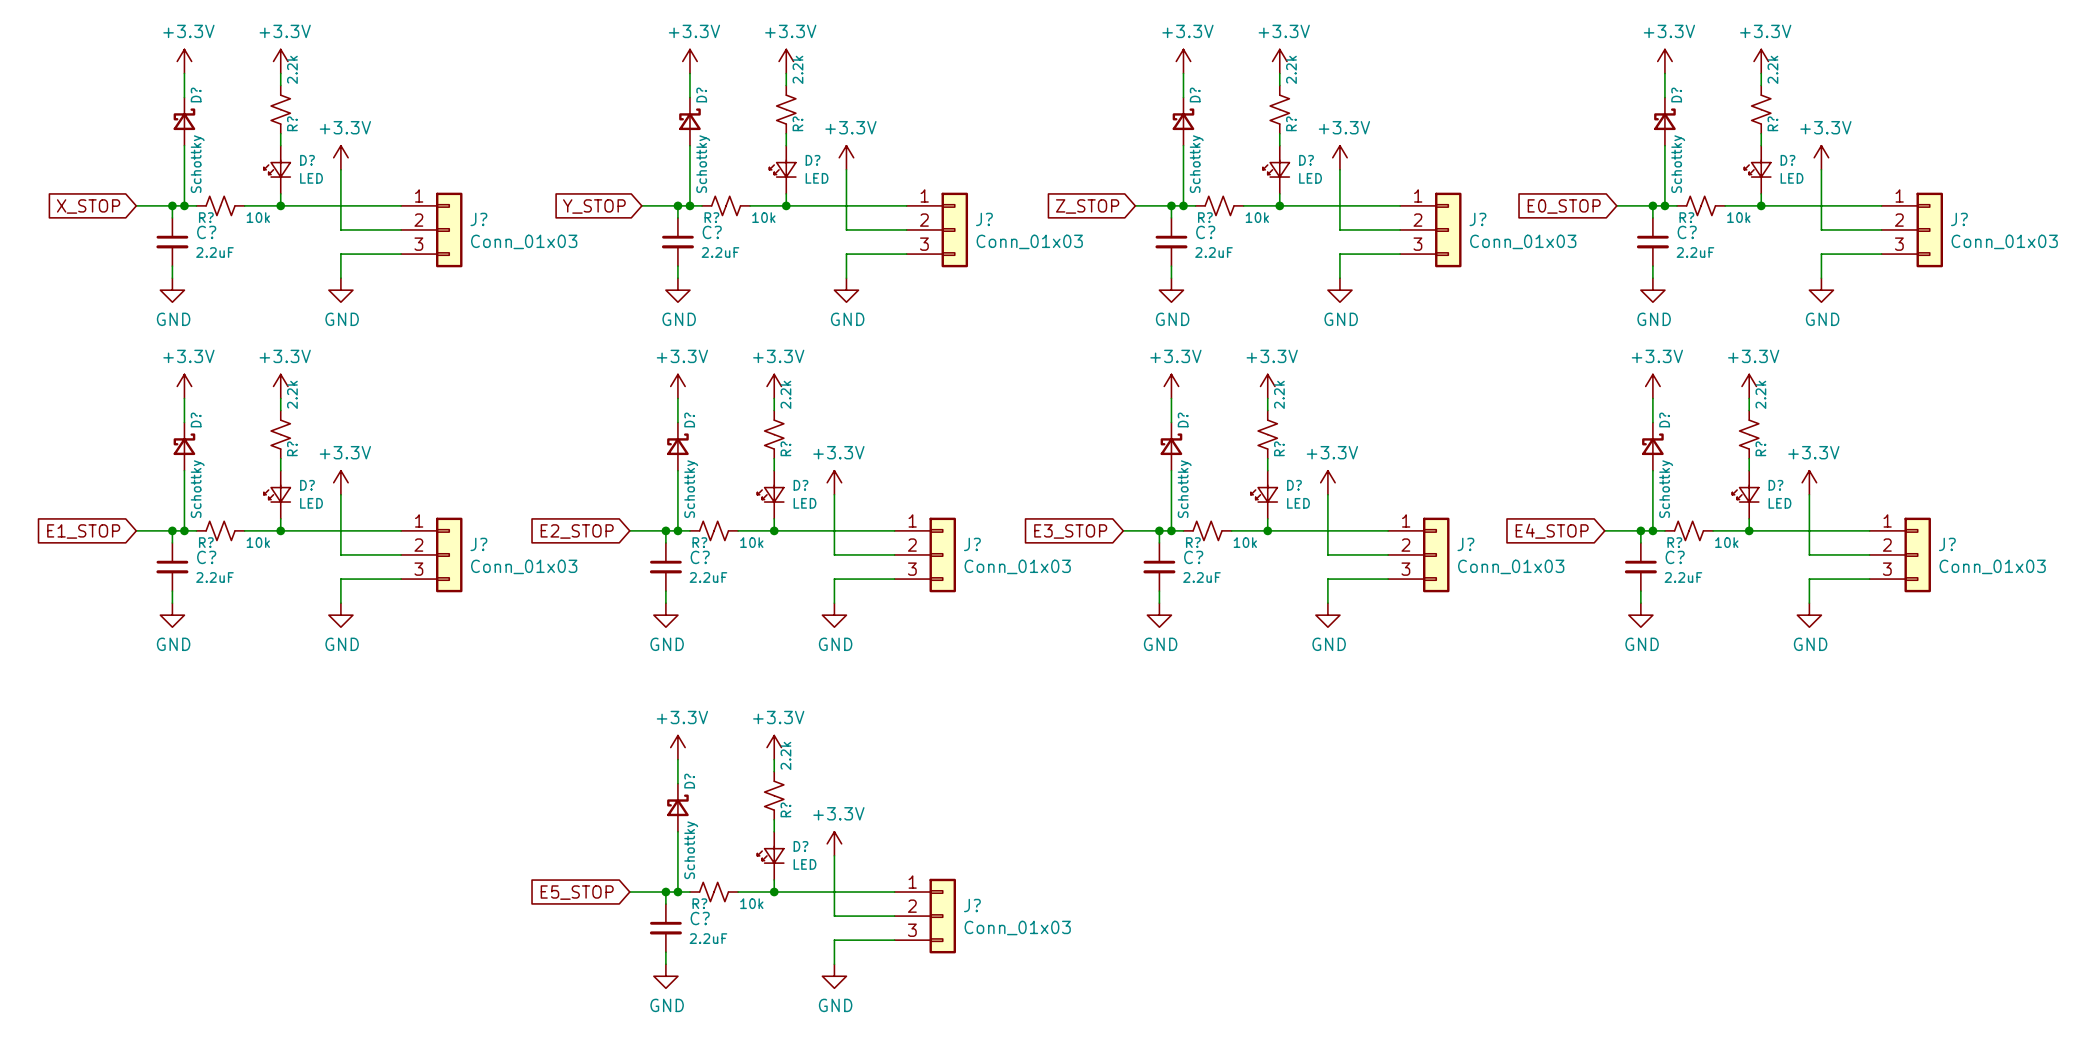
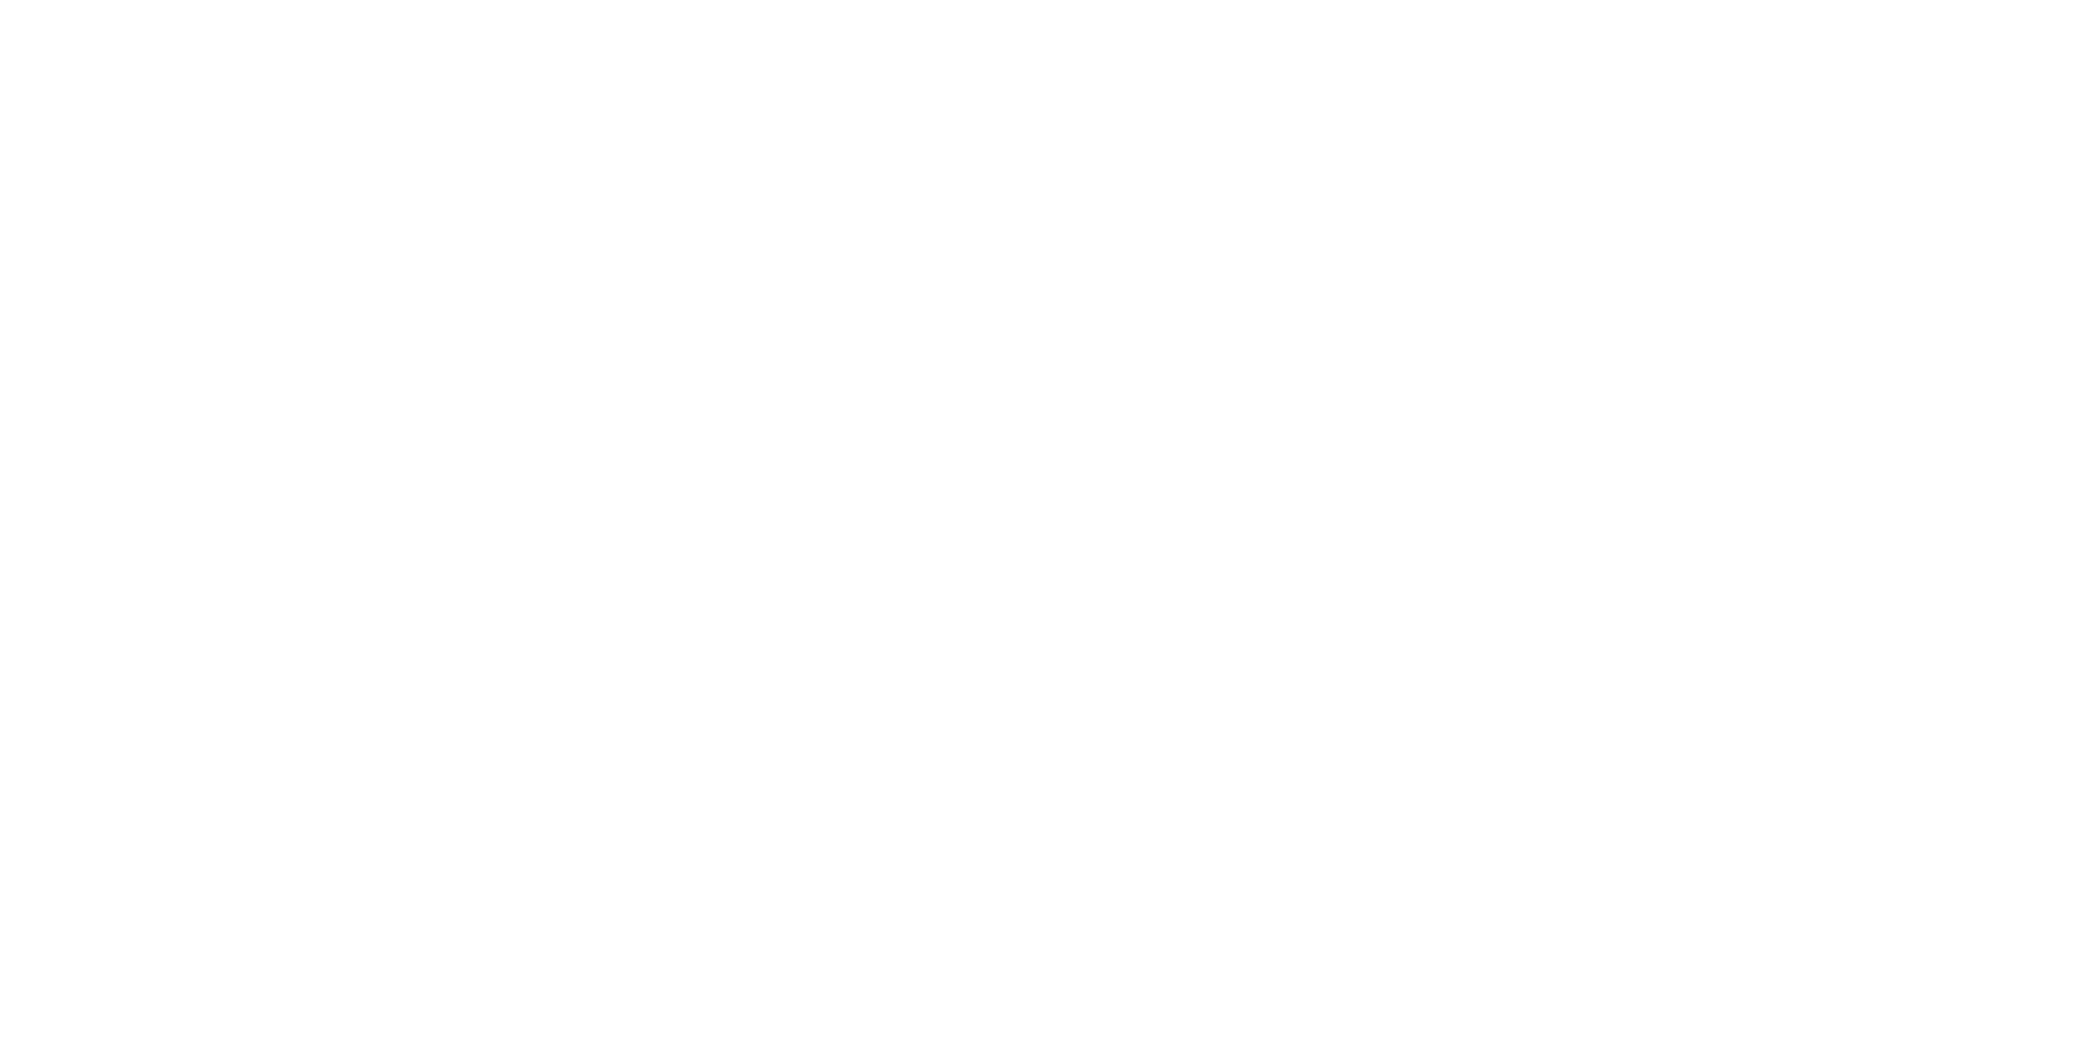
power symbol: +3.3V (184, 61) -> none
power symbol: +3.3V (280, 61) -> none
power symbol: +3.3V (689, 61) -> none
power symbol: +3.3V (786, 61) -> none
power symbol: +3.3V (1183, 61) -> none
power symbol: +3.3V (1279, 61) -> none
power symbol: +3.3V (1664, 61) -> none
power symbol: +3.3V (1761, 61) -> none
wire: (184, 73) (184, 97) -> none
wire: (280, 73) (280, 85) -> none
wire: (689, 73) (689, 97) -> none
wire: (786, 73) (786, 85) -> none
wire: (1183, 73) (1183, 97) -> none
wire: (1279, 73) (1279, 85) -> none
wire: (1664, 73) (1664, 97) -> none
wire: (1761, 73) (1761, 85) -> none
R?: 2.2k (280, 109) -> none
R?: 2.2k (786, 109) -> none
R?: 2.2k (1279, 109) -> none
R?: 2.2k (1761, 109) -> none
D?: Schottky (184, 121) -> none
D?: Schottky (689, 121) -> none
D?: Schottky (1183, 121) -> none
D?: Schottky (1664, 121) -> none
wire: (280, 133) (280, 145) -> none
wire: (786, 133) (786, 145) -> none
wire: (1279, 133) (1279, 145) -> none
wire: (1761, 133) (1761, 145) -> none
wire: (184, 145) (184, 205) -> none
wire: (689, 145) (689, 205) -> none
wire: (1183, 145) (1183, 205) -> none
wire: (1664, 145) (1664, 205) -> none
power symbol: +3.3V (340, 157) -> none
power symbol: +3.3V (846, 157) -> none
power symbol: +3.3V (1339, 157) -> none
power symbol: +3.3V (1821, 157) -> none
D?: LED (277, 169) -> none
wire: (340, 169) (340, 229) (401, 229) -> none
D?: LED (782, 169) -> none
wire: (846, 169) (846, 229) (906, 229) -> none
D?: LED (1276, 169) -> none
wire: (1339, 169) (1339, 229) (1400, 229) -> none
D?: LED (1757, 169) -> none
wire: (1821, 169) (1821, 229) (1881, 229) -> none
wire: (280, 193) (280, 205) -> none
wire: (786, 193) (786, 205) -> none
wire: (1279, 193) (1279, 205) -> none
wire: (1761, 193) (1761, 205) -> none
wire: (136, 205) (196, 205) -> none
wire: (172, 205) (172, 217) -> none
junction: (172, 205) -> none
junction: (184, 205) -> none
R?: 10k (220, 205) -> none
wire: (244, 205) (401, 205) -> none
junction: (280, 205) -> none
wire: (641, 205) (702, 205) -> none
wire: (677, 205) (677, 217) -> none
junction: (677, 205) -> none
junction: (689, 205) -> none
R?: 10k (726, 205) -> none
wire: (750, 205) (906, 205) -> none
junction: (786, 205) -> none
wire: (1135, 205) (1195, 205) -> none
wire: (1171, 205) (1171, 217) -> none
junction: (1171, 205) -> none
junction: (1183, 205) -> none
R?: 10k (1219, 205) -> none
wire: (1243, 205) (1400, 205) -> none
junction: (1279, 205) -> none
wire: (1616, 205) (1676, 205) -> none
wire: (1652, 205) (1652, 217) -> none
junction: (1652, 205) -> none
junction: (1664, 205) -> none
R?: 10k (1701, 205) -> none
wire: (1725, 205) (1881, 205) -> none
junction: (1761, 205) -> none
global label: X_STOP (88, 206) -> none
global label: Y_STOP (594, 206) -> none
global label: Z_STOP (1087, 206) -> none
global label: E0_STOP (1564, 206) -> none
J?: Conn_01x03 (431, 229) -> none
J?: Conn_01x03 (937, 229) -> none
J?: Conn_01x03 (1430, 229) -> none
J?: Conn_01x03 (1912, 229) -> none
C?: 2.2uF (172, 242) -> none
C?: 2.2uF (677, 242) -> none
C?: 2.2uF (1171, 242) -> none
C?: 2.2uF (1652, 242) -> none
wire: (401, 254) (340, 254) (340, 278) -> none
wire: (906, 254) (846, 254) (846, 278) -> none
wire: (1400, 254) (1339, 254) (1339, 278) -> none
wire: (1881, 254) (1821, 254) (1821, 278) -> none
wire: (172, 266) (172, 278) -> none
wire: (677, 266) (677, 278) -> none
wire: (1171, 266) (1171, 278) -> none
wire: (1652, 266) (1652, 278) -> none
power symbol: GND (172, 290) -> none
power symbol: GND (340, 290) -> none
power symbol: GND (677, 290) -> none
power symbol: GND (846, 290) -> none
power symbol: GND (1171, 290) -> none
power symbol: GND (1339, 290) -> none
power symbol: GND (1652, 290) -> none
power symbol: GND (1821, 290) -> none
power symbol: +3.3V (184, 386) -> none
power symbol: +3.3V (280, 386) -> none
power symbol: +3.3V (677, 386) -> none
power symbol: +3.3V (774, 386) -> none
power symbol: +3.3V (1171, 386) -> none
power symbol: +3.3V (1267, 386) -> none
power symbol: +3.3V (1652, 386) -> none
power symbol: +3.3V (1749, 386) -> none
wire: (184, 398) (184, 422) -> none
wire: (280, 398) (280, 410) -> none
wire: (677, 398) (677, 422) -> none
wire: (774, 398) (774, 410) -> none
wire: (1171, 398) (1171, 422) -> none
wire: (1267, 398) (1267, 410) -> none
wire: (1652, 398) (1652, 422) -> none
wire: (1749, 398) (1749, 410) -> none
R?: 2.2k (280, 434) -> none
R?: 2.2k (774, 434) -> none
R?: 2.2k (1267, 434) -> none
R?: 2.2k (1749, 434) -> none
D?: Schottky (184, 446) -> none
D?: Schottky (677, 446) -> none
D?: Schottky (1171, 446) -> none
D?: Schottky (1652, 446) -> none
wire: (280, 458) (280, 470) -> none
wire: (774, 458) (774, 470) -> none
wire: (1267, 458) (1267, 470) -> none
wire: (1749, 458) (1749, 470) -> none
wire: (184, 470) (184, 530) -> none
wire: (677, 470) (677, 530) -> none
wire: (1171, 470) (1171, 530) -> none
wire: (1652, 470) (1652, 530) -> none
power symbol: +3.3V (340, 482) -> none
power symbol: +3.3V (834, 482) -> none
power symbol: +3.3V (1327, 482) -> none
power symbol: +3.3V (1809, 482) -> none
D?: LED (277, 494) -> none
wire: (340, 494) (340, 554) (401, 554) -> none
D?: LED (770, 494) -> none
wire: (834, 494) (834, 554) (894, 554) -> none
D?: LED (1264, 494) -> none
wire: (1327, 494) (1327, 554) (1388, 554) -> none
D?: LED (1745, 494) -> none
wire: (1809, 494) (1809, 554) (1869, 554) -> none
wire: (280, 518) (280, 530) -> none
wire: (774, 518) (774, 530) -> none
wire: (1267, 518) (1267, 530) -> none
wire: (1749, 518) (1749, 530) -> none
wire: (136, 530) (196, 530) -> none
wire: (172, 530) (172, 542) -> none
junction: (172, 530) -> none
junction: (184, 530) -> none
R?: 10k (220, 530) -> none
wire: (244, 530) (401, 530) -> none
junction: (280, 530) -> none
wire: (629, 530) (689, 530) -> none
wire: (665, 530) (665, 542) -> none
junction: (665, 530) -> none
junction: (677, 530) -> none
R?: 10k (714, 530) -> none
wire: (738, 530) (894, 530) -> none
junction: (774, 530) -> none
wire: (1123, 530) (1183, 530) -> none
wire: (1159, 530) (1159, 542) -> none
junction: (1159, 530) -> none
junction: (1171, 530) -> none
R?: 10k (1207, 530) -> none
wire: (1231, 530) (1388, 530) -> none
junction: (1267, 530) -> none
wire: (1604, 530) (1664, 530) -> none
wire: (1640, 530) (1640, 542) -> none
junction: (1640, 530) -> none
junction: (1652, 530) -> none
R?: 10k (1689, 530) -> none
wire: (1713, 530) (1869, 530) -> none
junction: (1749, 530) -> none
global label: E1_STOP (83, 531) -> none
global label: E2_STOP (577, 531) -> none
global label: E3_STOP (1070, 531) -> none
global label: E4_STOP (1552, 531) -> none
J?: Conn_01x03 (431, 554) -> none
J?: Conn_01x03 (925, 554) -> none
J?: Conn_01x03 (1418, 554) -> none
J?: Conn_01x03 (1900, 554) -> none
C?: 2.2uF (172, 567) -> none
C?: 2.2uF (665, 567) -> none
C?: 2.2uF (1159, 567) -> none
C?: 2.2uF (1640, 567) -> none
wire: (401, 579) (340, 579) (340, 603) -> none
wire: (894, 579) (834, 579) (834, 603) -> none
wire: (1388, 579) (1327, 579) (1327, 603) -> none
wire: (1869, 579) (1809, 579) (1809, 603) -> none
wire: (172, 591) (172, 603) -> none
wire: (665, 591) (665, 603) -> none
wire: (1159, 591) (1159, 603) -> none
wire: (1640, 591) (1640, 603) -> none
power symbol: GND (172, 615) -> none
power symbol: GND (340, 615) -> none
power symbol: GND (665, 615) -> none
power symbol: GND (834, 615) -> none
power symbol: GND (1159, 615) -> none
power symbol: GND (1327, 615) -> none
power symbol: GND (1640, 615) -> none
power symbol: GND (1809, 615) -> none
power symbol: +3.3V (677, 747) -> none
power symbol: +3.3V (774, 747) -> none
wire: (677, 759) (677, 783) -> none
wire: (774, 759) (774, 771) -> none
R?: 2.2k (774, 795) -> none
D?: Schottky (677, 807) -> none
wire: (774, 819) (774, 831) -> none
wire: (677, 831) (677, 892) -> none
power symbol: +3.3V (834, 843) -> none
D?: LED (770, 855) -> none
wire: (834, 855) (834, 916) (894, 916) -> none
wire: (774, 879) (774, 892) -> none
global label: E5_STOP (577, 892) -> none
wire: (629, 892) (689, 892) -> none
wire: (665, 892) (665, 904) -> none
junction: (665, 892) -> none
junction: (677, 892) -> none
R?: 10k (714, 892) -> none
wire: (738, 892) (894, 892) -> none
junction: (774, 892) -> none
J?: Conn_01x03 (925, 916) -> none
C?: 2.2uF (665, 928) -> none
wire: (894, 940) (834, 940) (834, 964) -> none
wire: (665, 952) (665, 964) -> none
power symbol: GND (665, 976) -> none
power symbol: GND (834, 976) -> none

